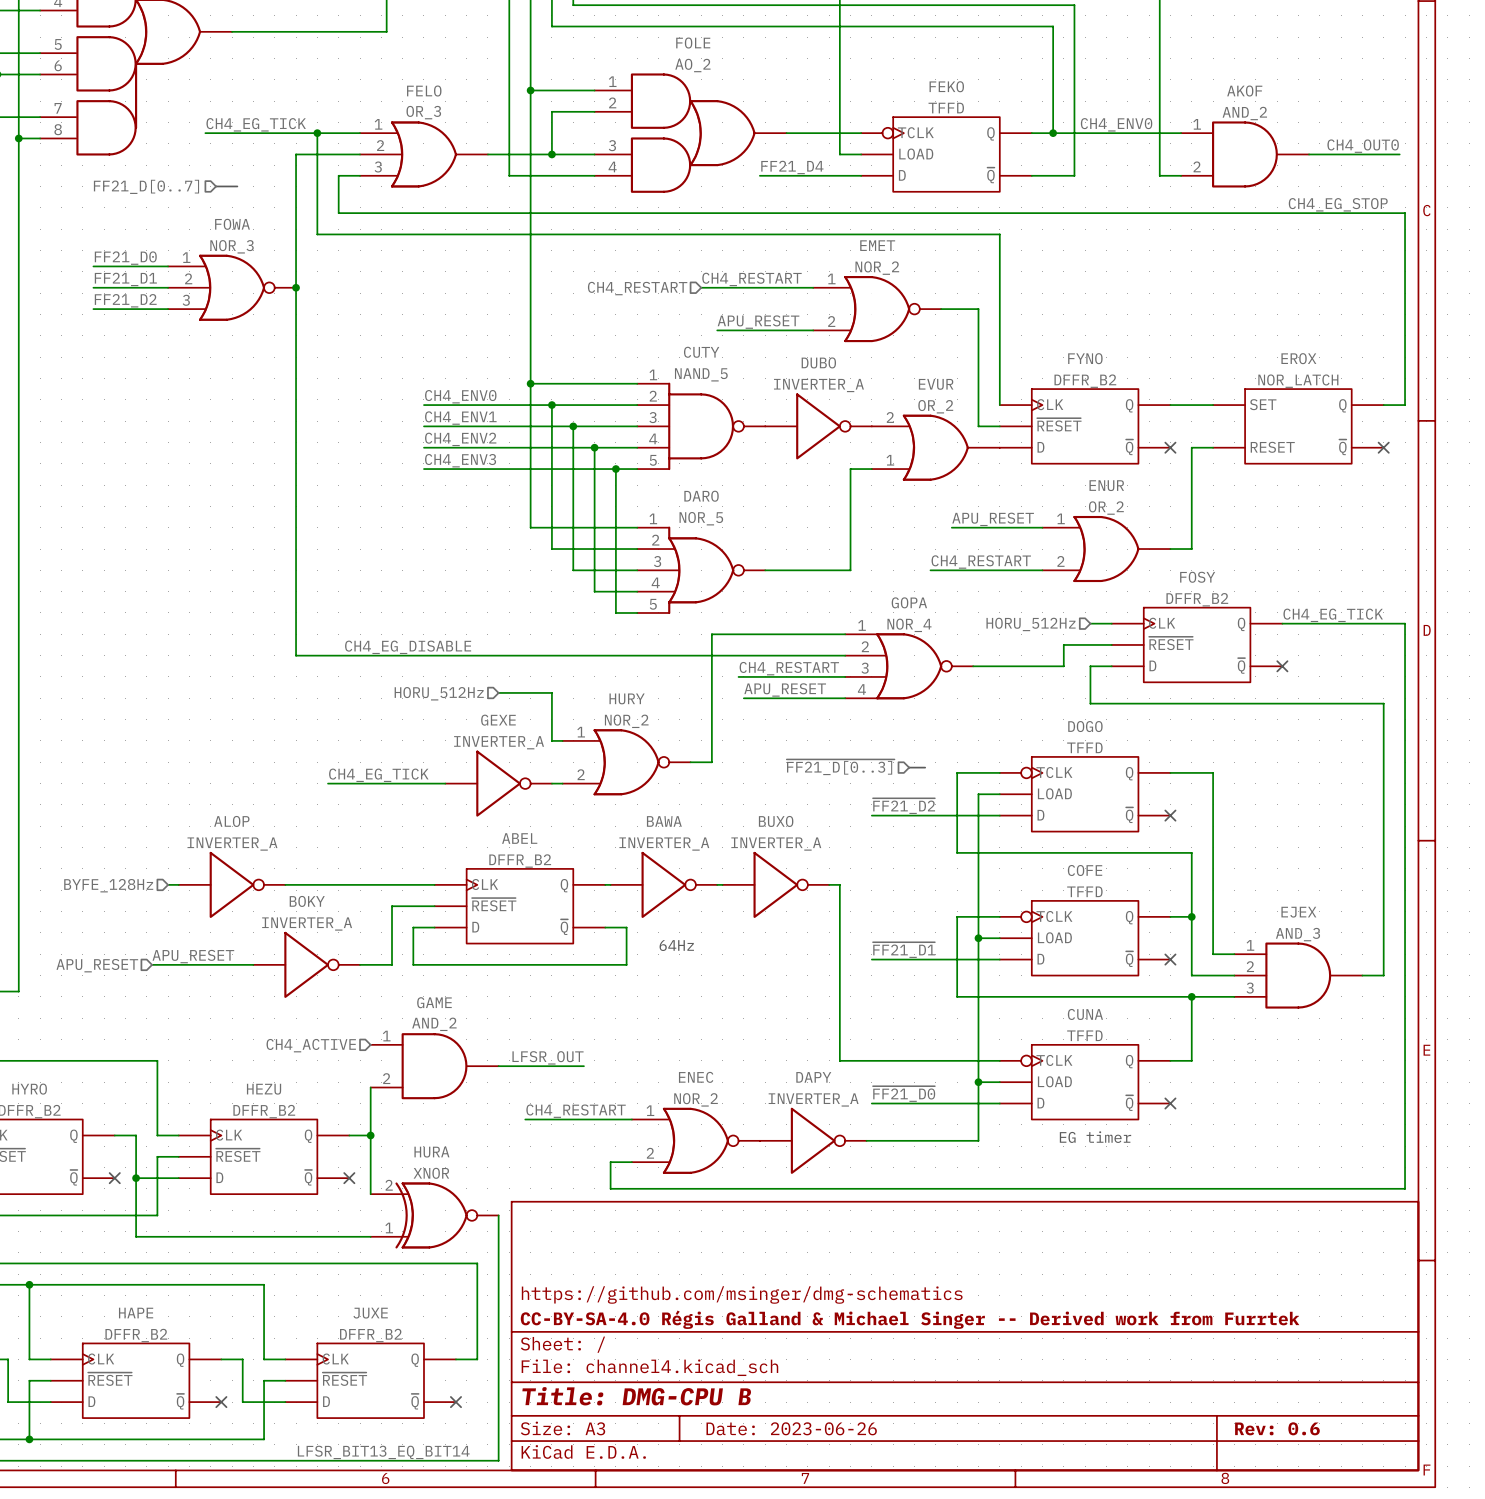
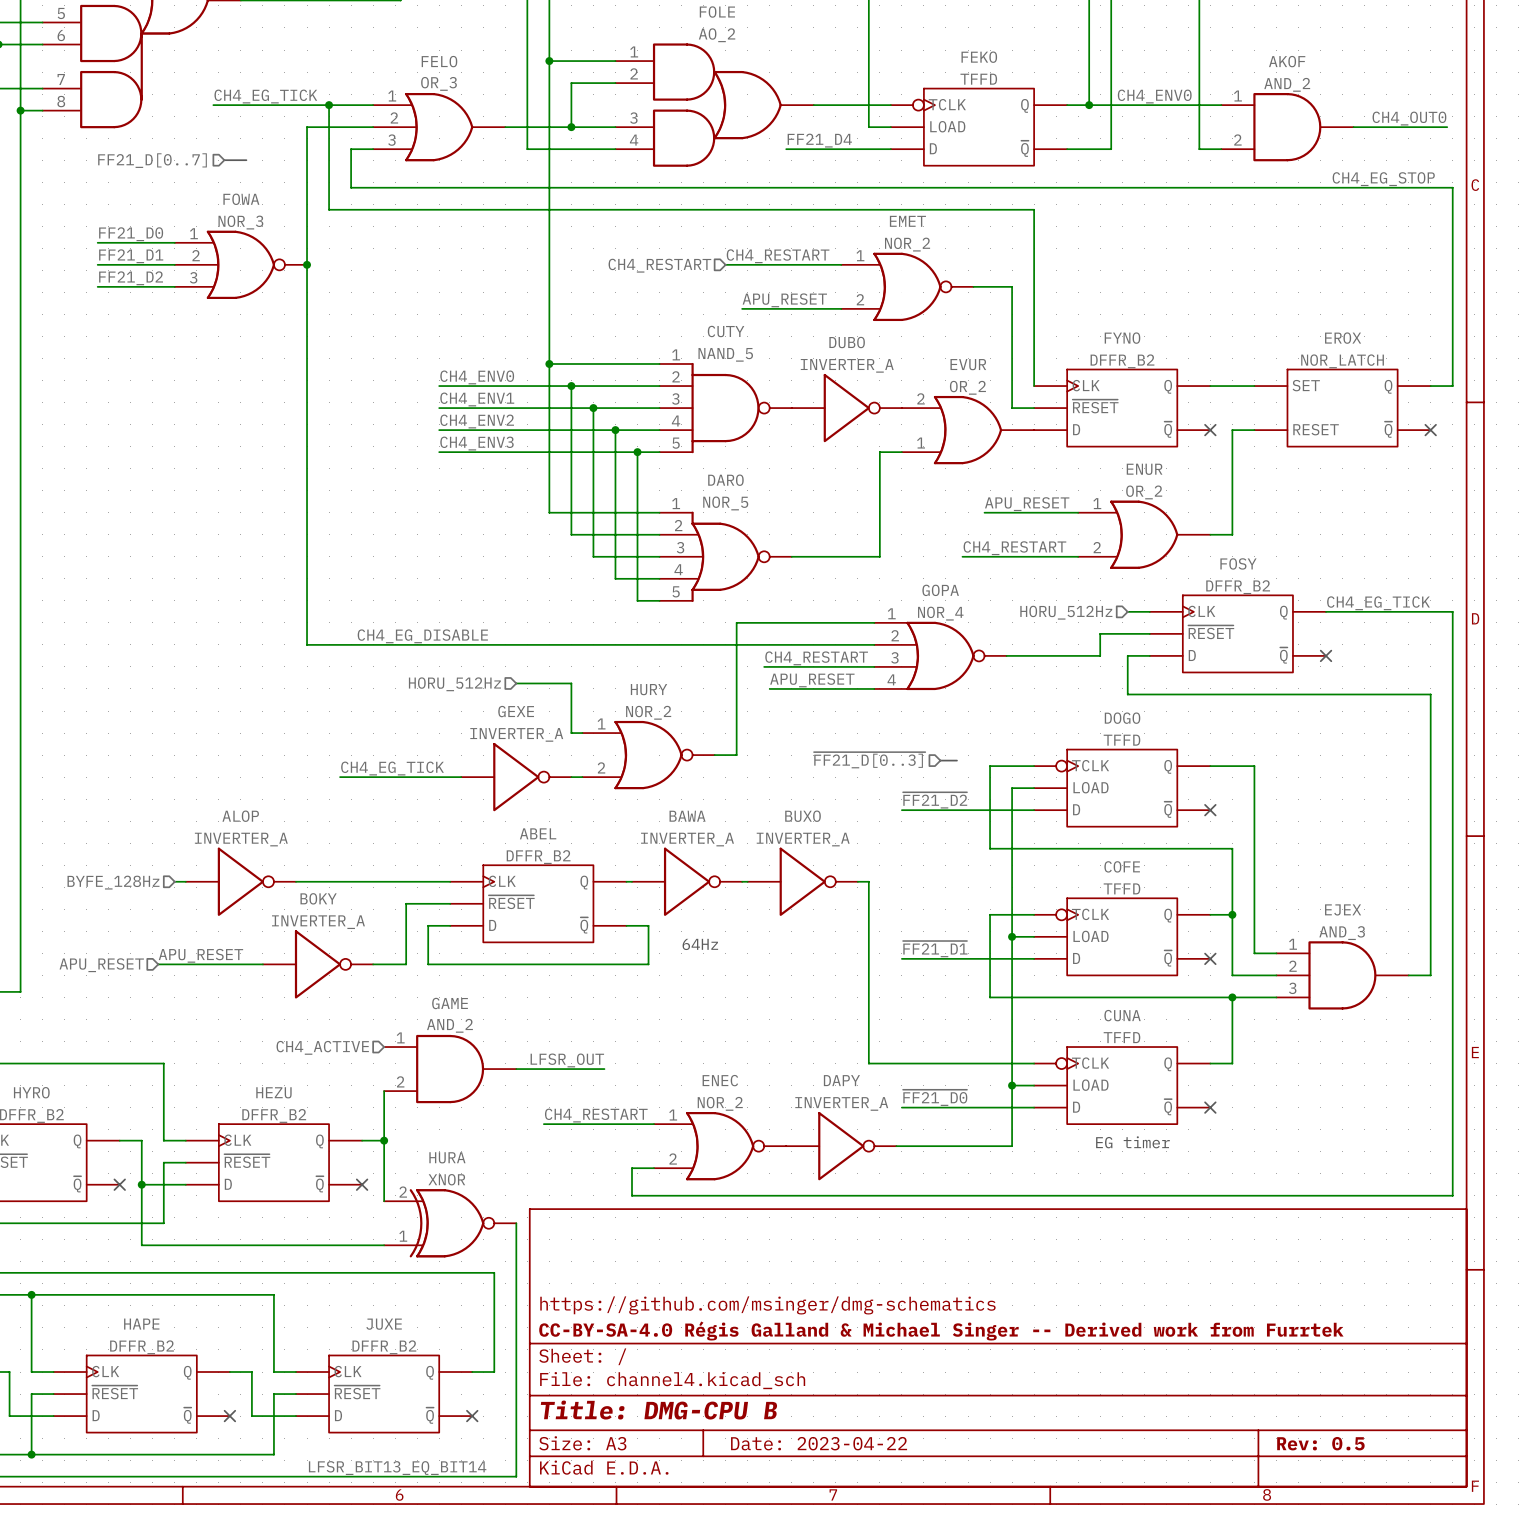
title block: Date: 2023-06-26 (791, 1428) -> Date: 2023-04-22 (819, 1443)
title block: Rev: 0.6 (1277, 1428) -> Rev: 0.5 (1320, 1443)

